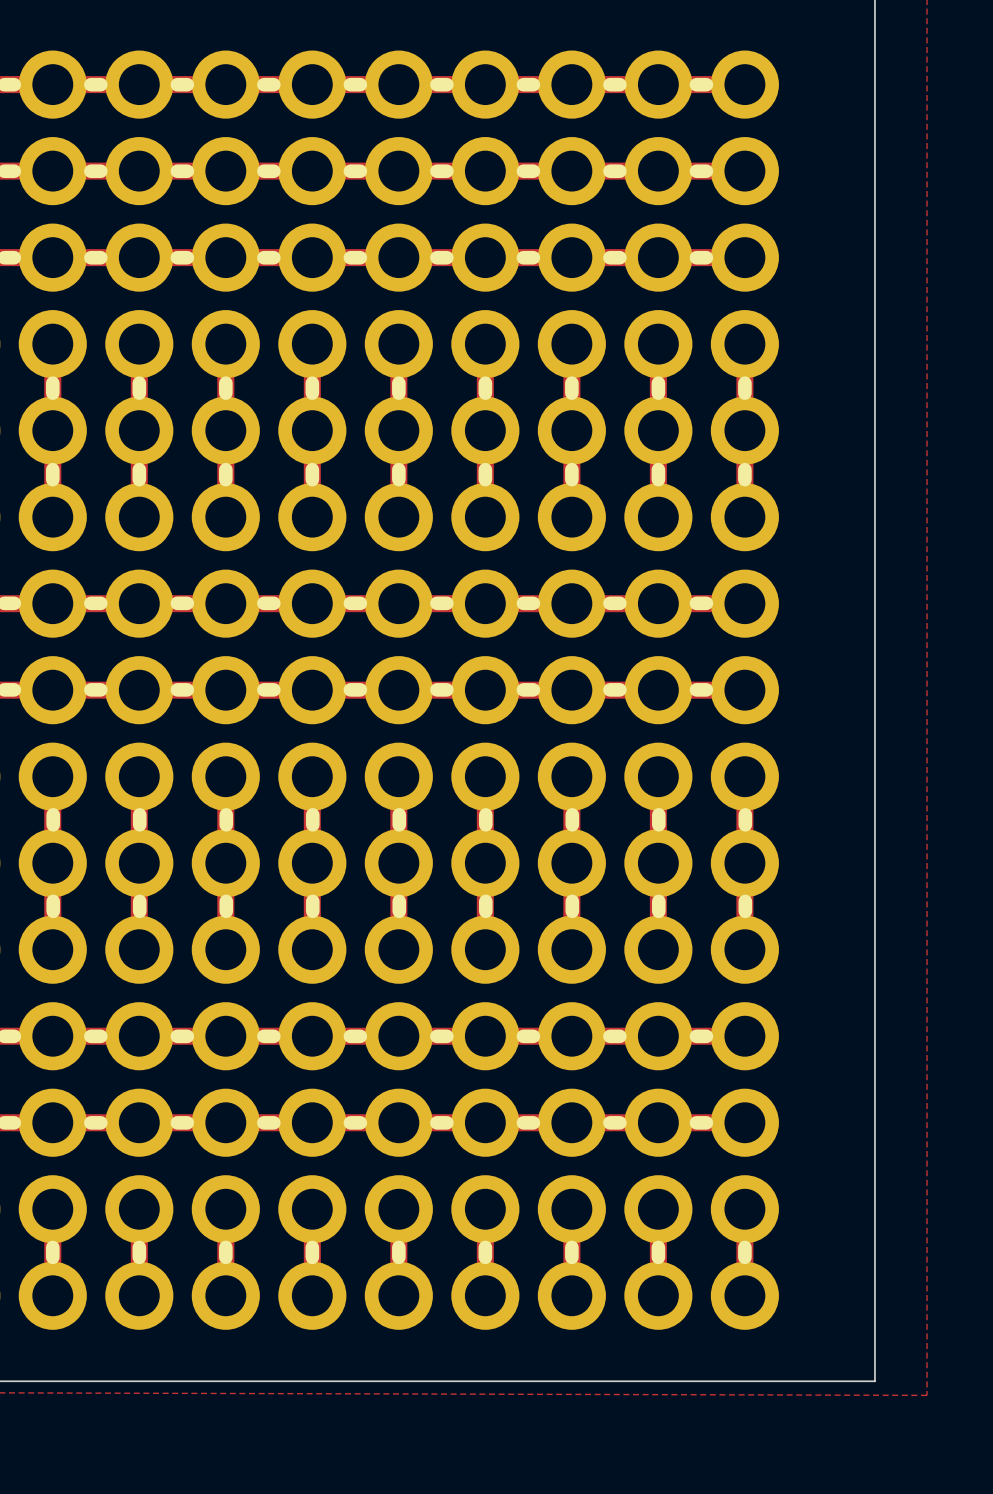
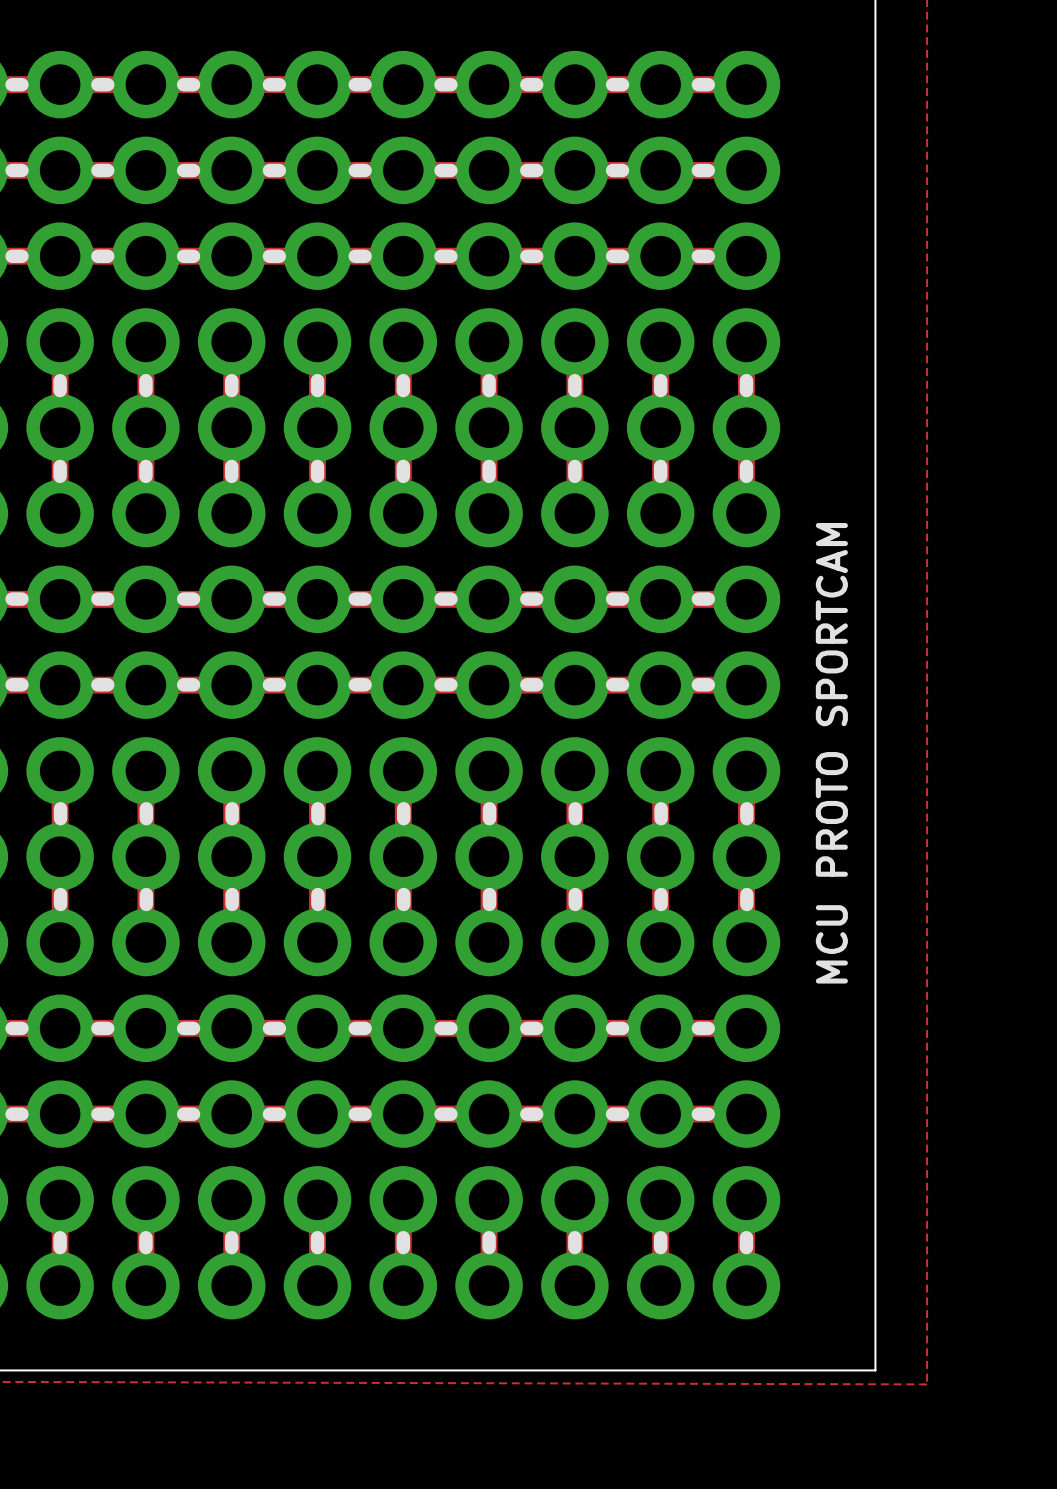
text: none -> MCU PROTO SPORTCAM (831, 753)

